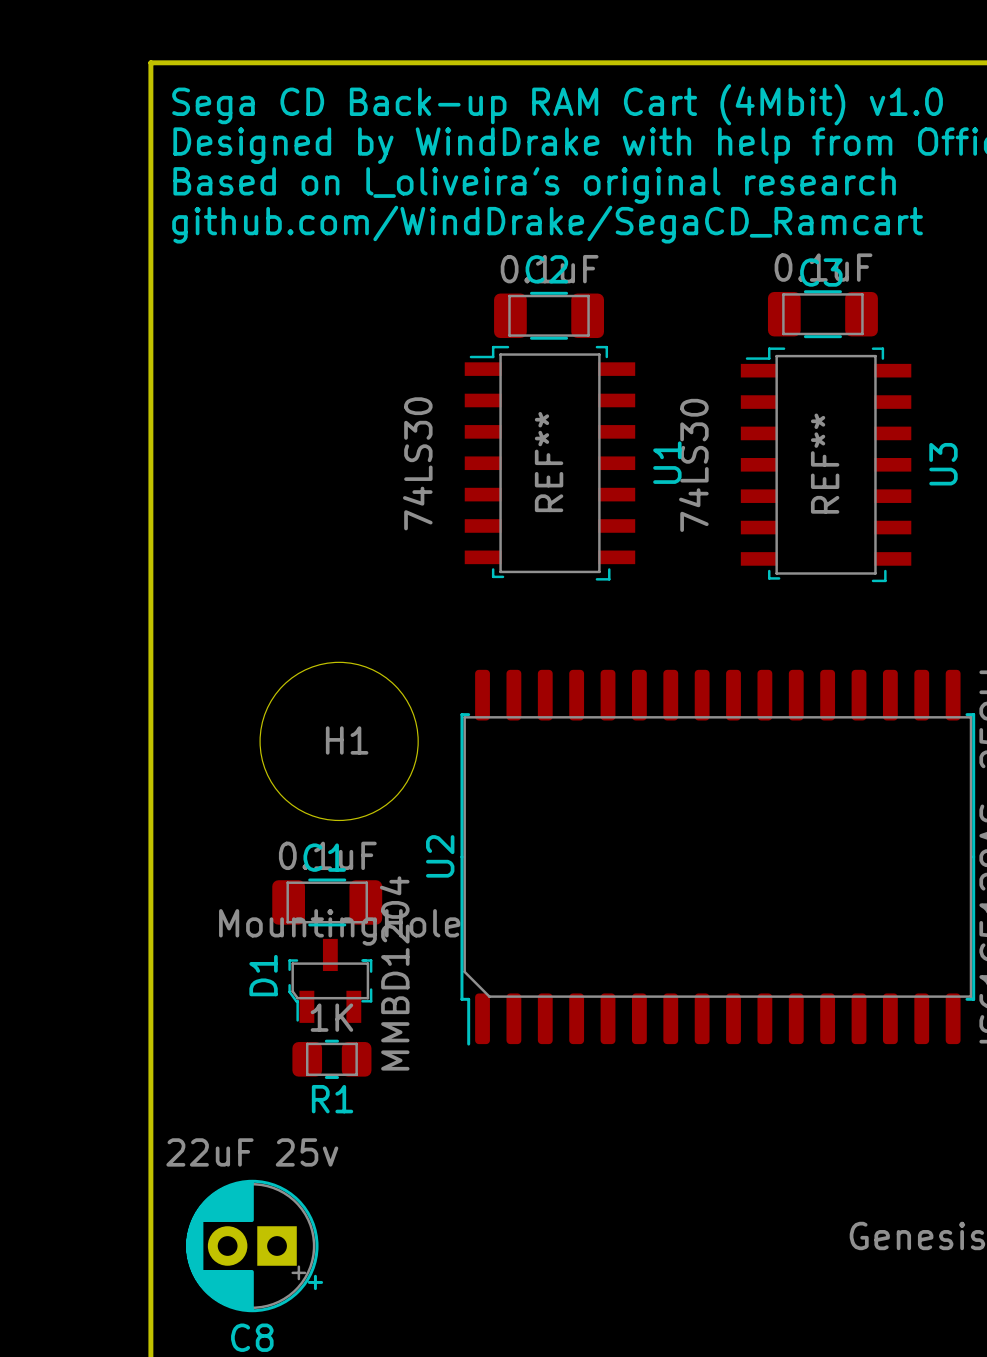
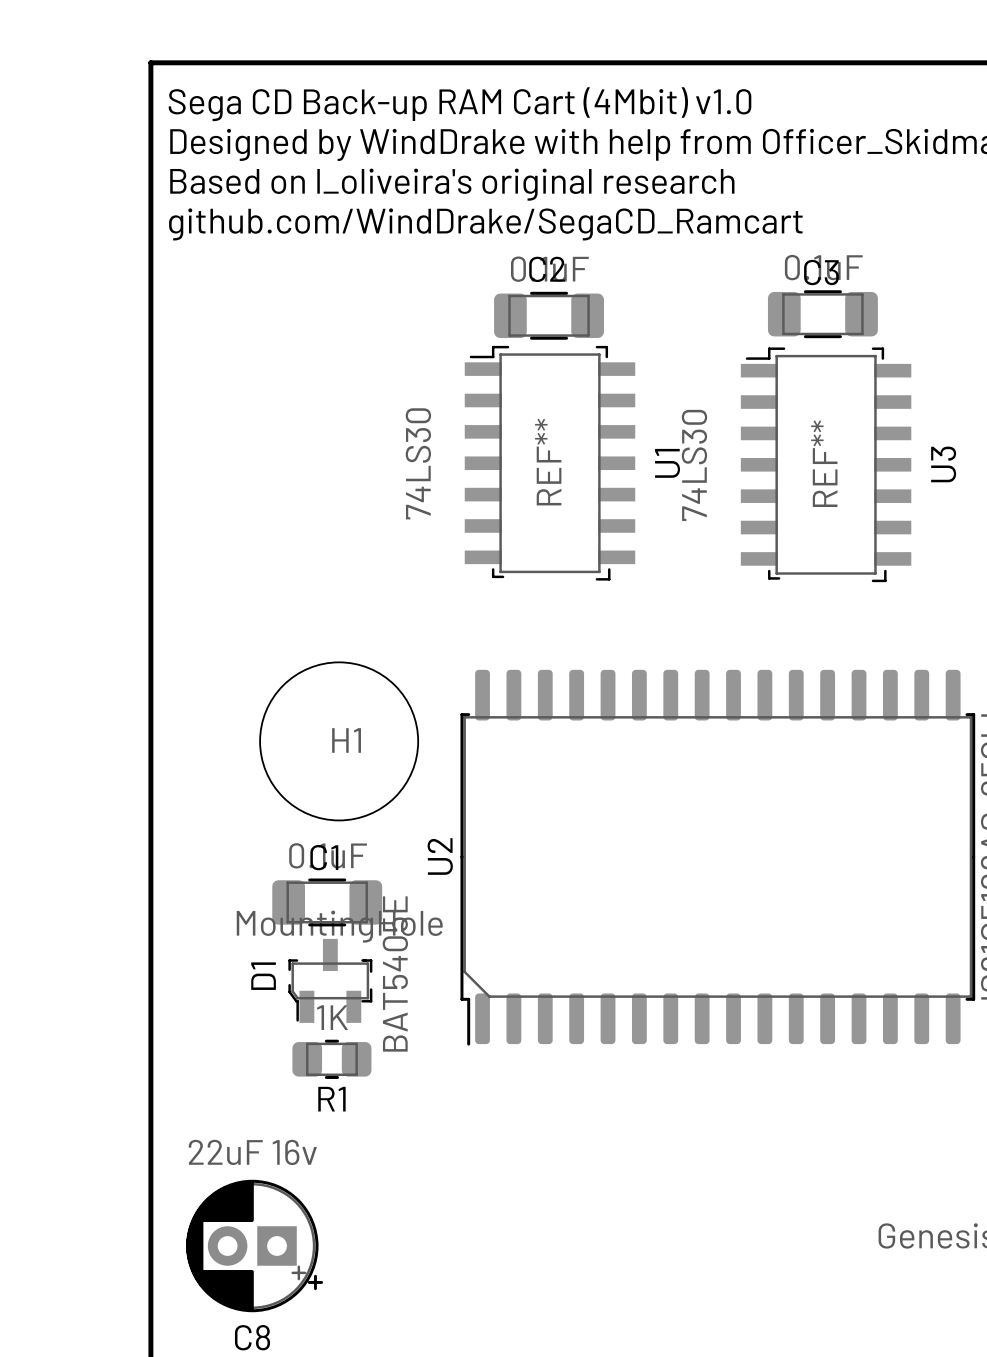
D1 value: MMBD1204 (394, 973) -> BAT5405E (395, 973)
C8 value: 22uF 25v (252, 1152) -> 22uF 16v (252, 1152)

